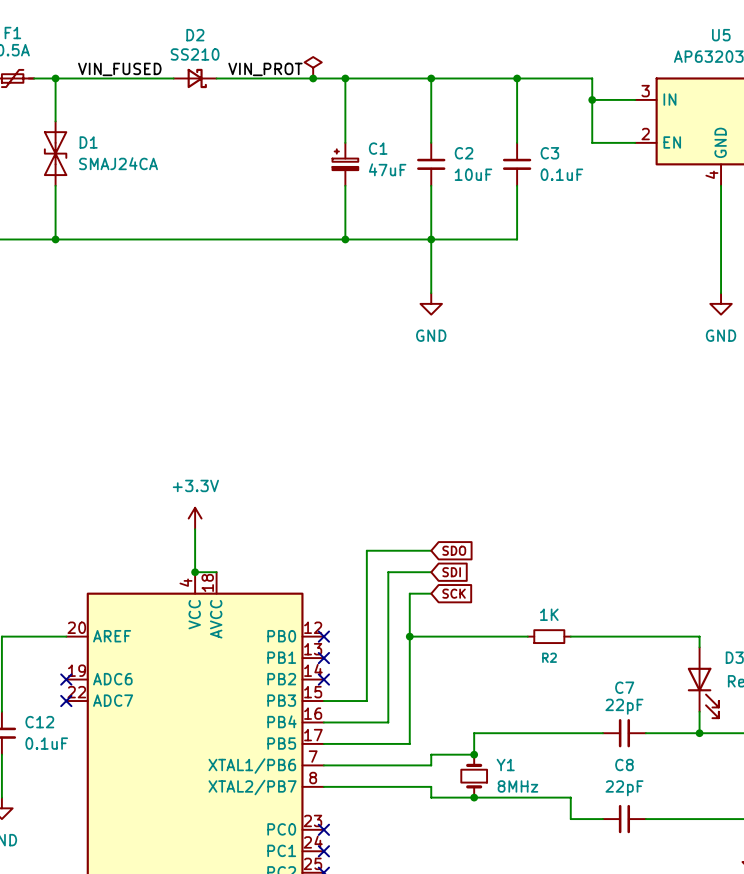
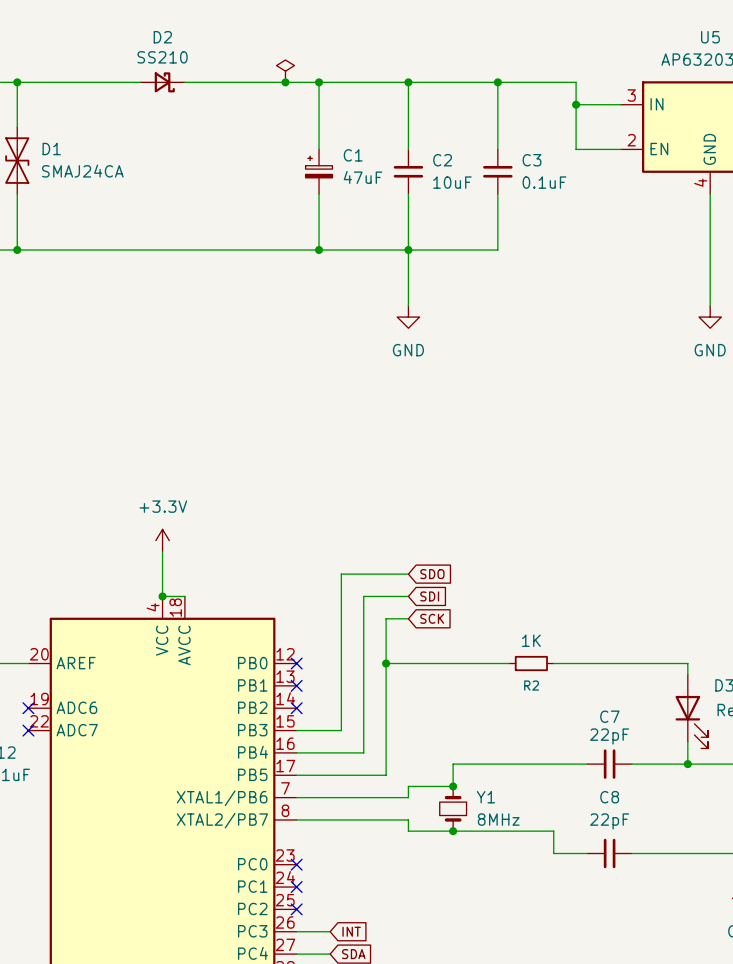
label: VIN_FUSED (119, 69) -> none
label: VIN_PROT (265, 69) -> none

